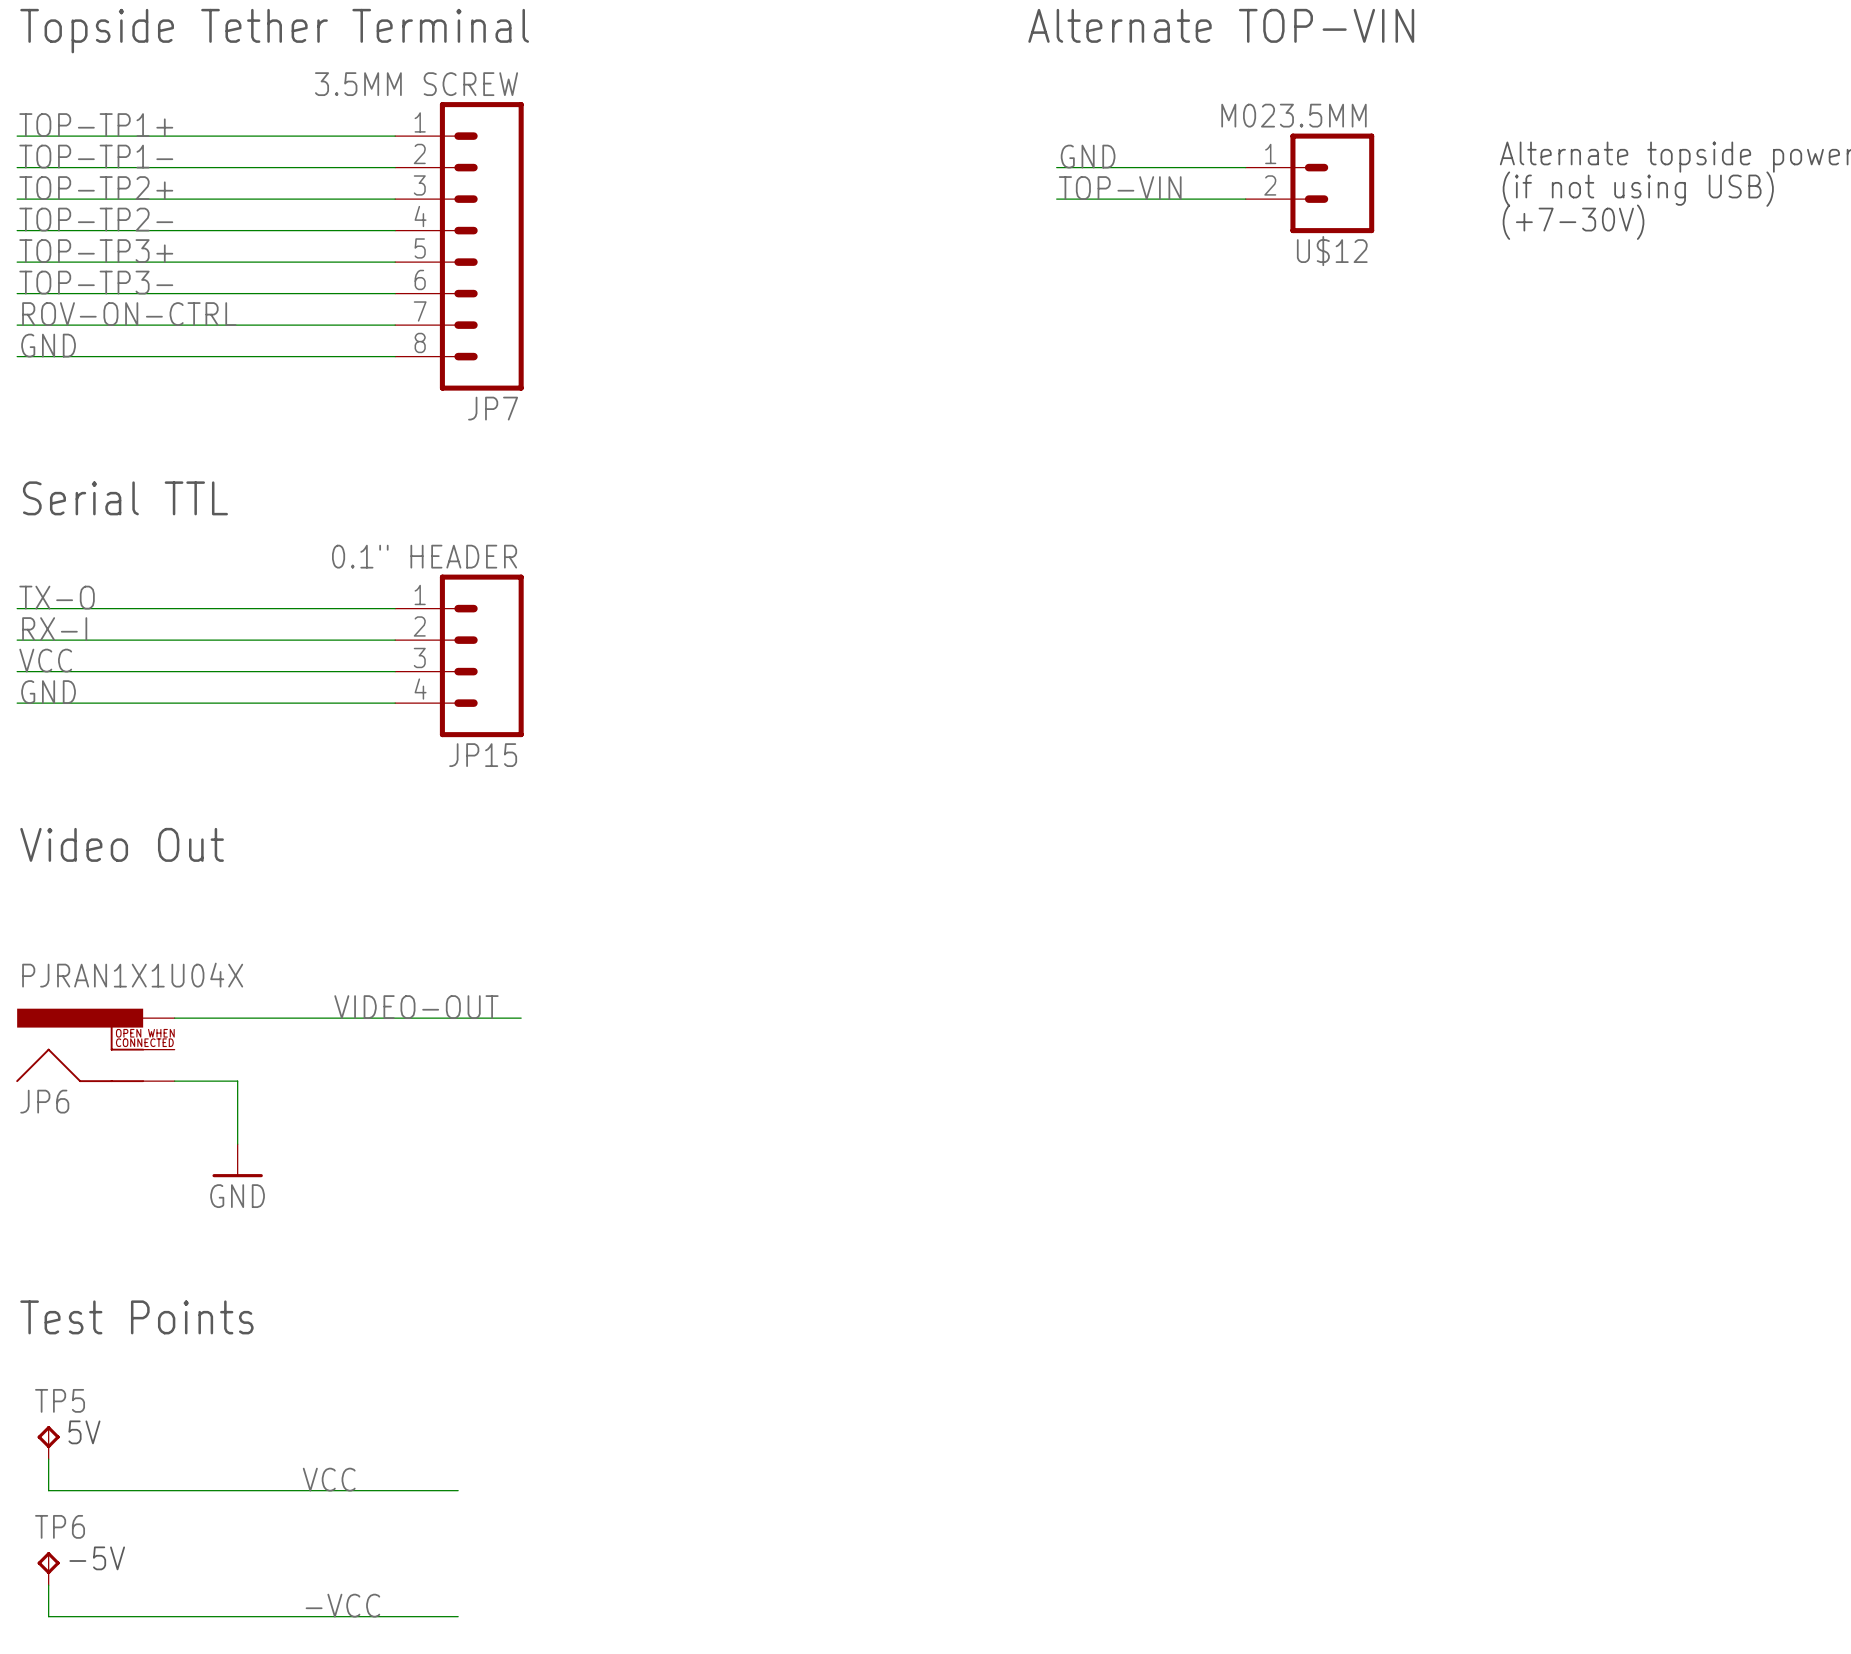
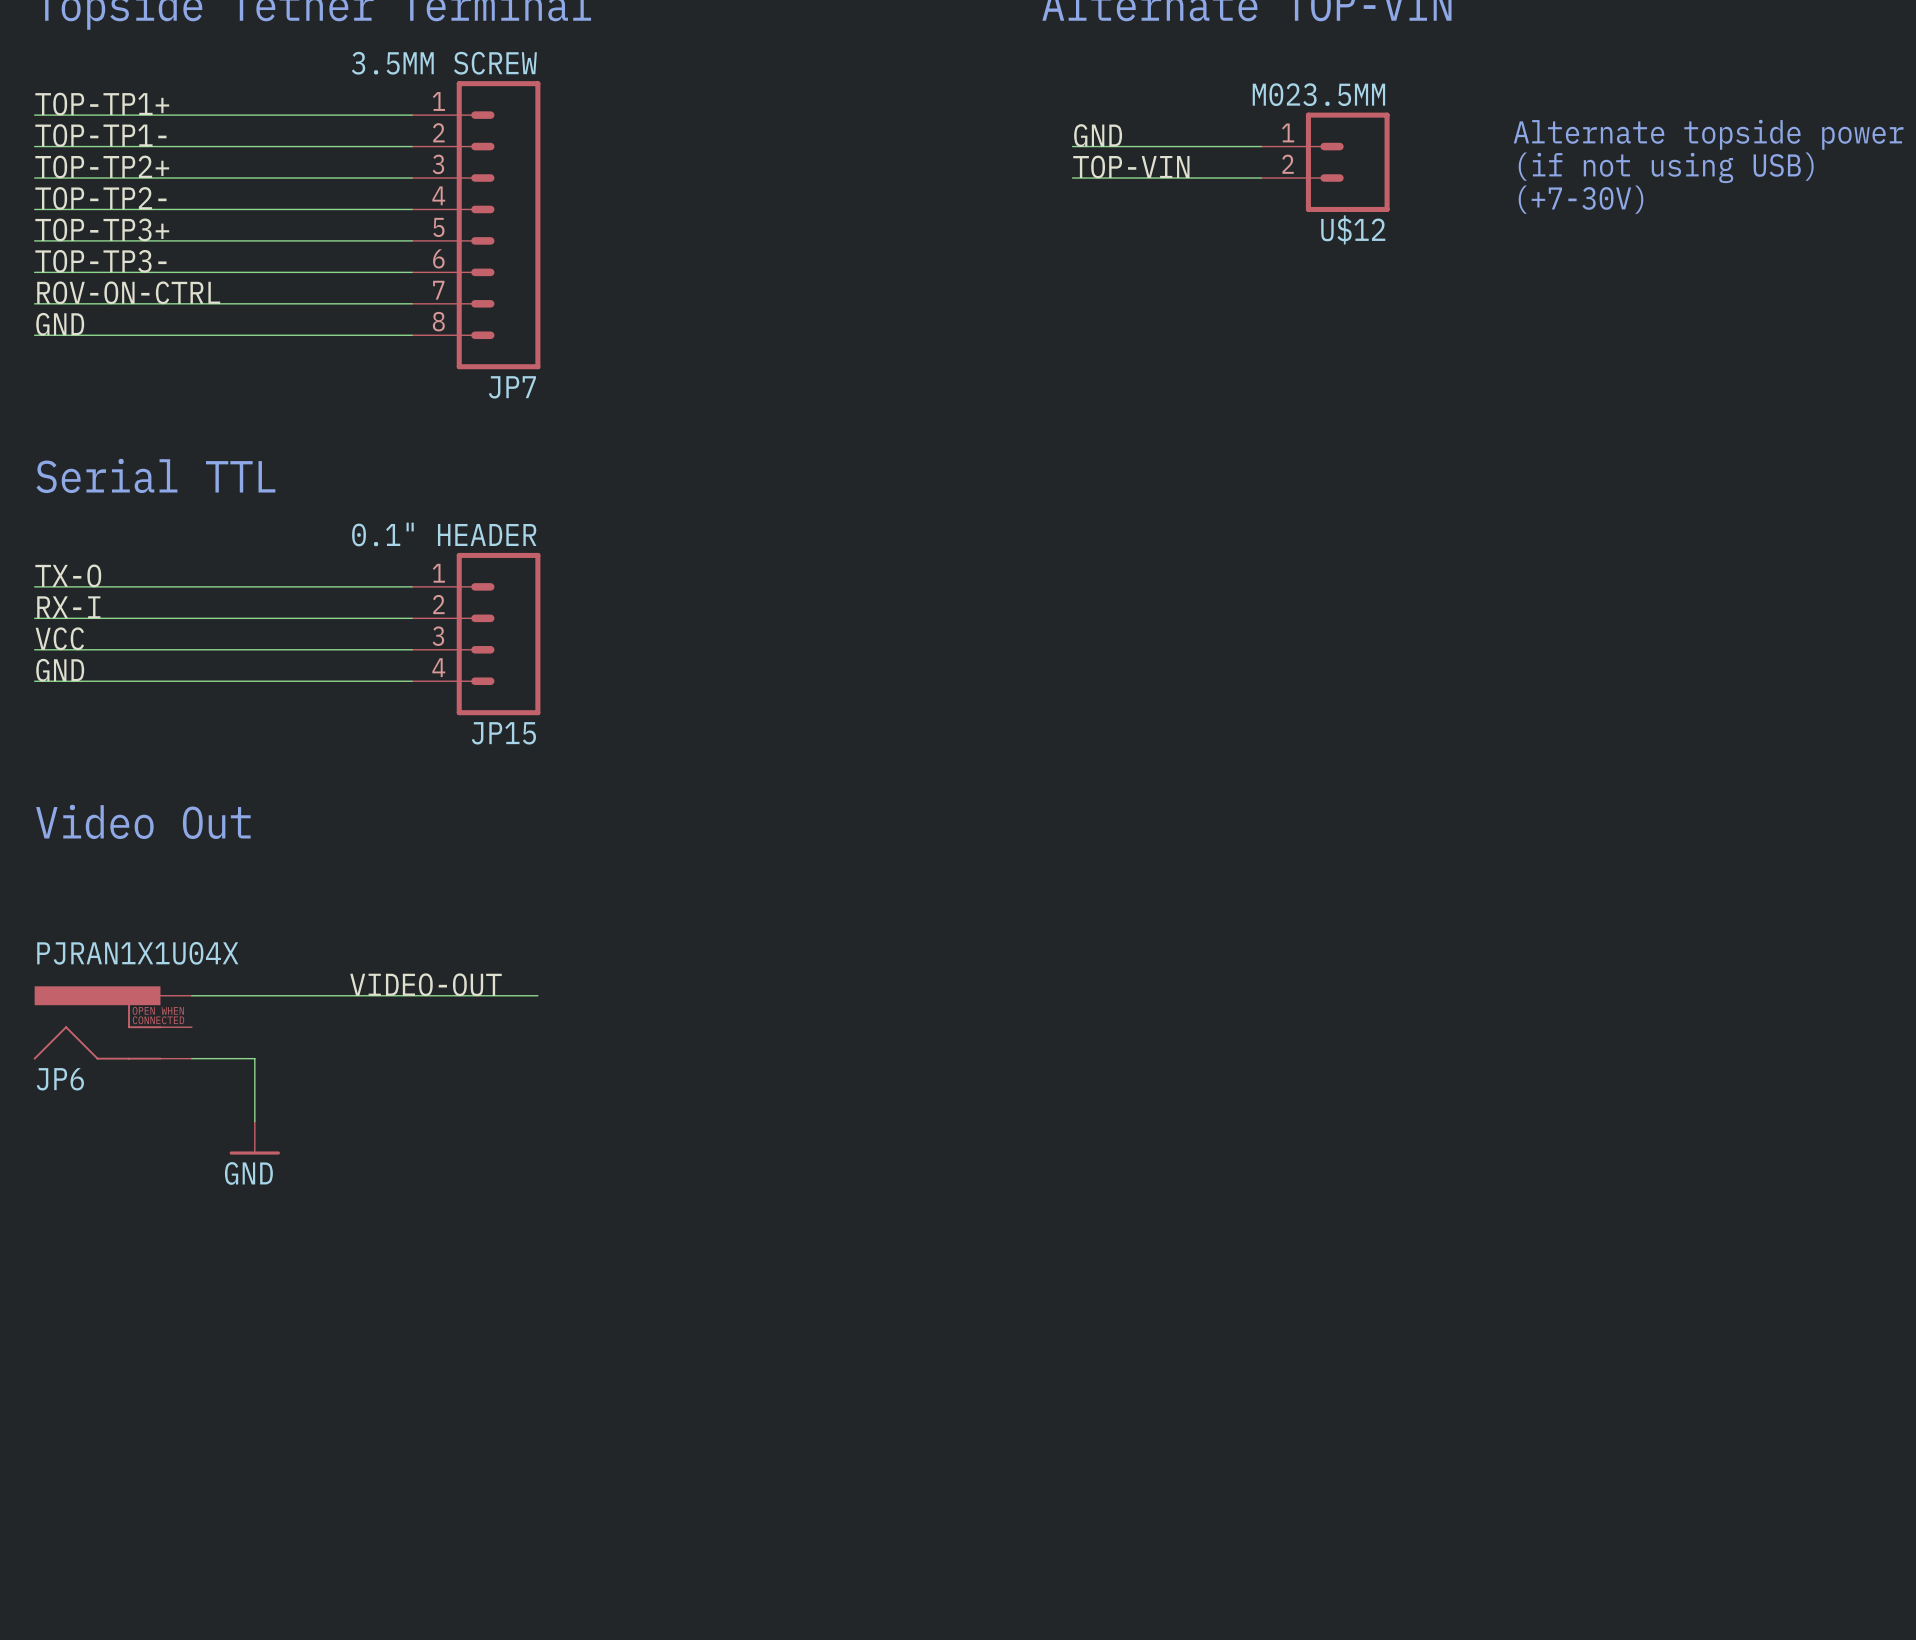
text: Test Points (136, 1317) -> none
TP5: 5V (48, 1442) -> none
wire: (48, 1459) (48, 1490) (458, 1490) -> none
label: VCC (329, 1479) -> none
TP6: -5V (48, 1568) -> none
wire: (48, 1585) (48, 1616) (458, 1616) -> none
label: -VCC (342, 1605) -> none

